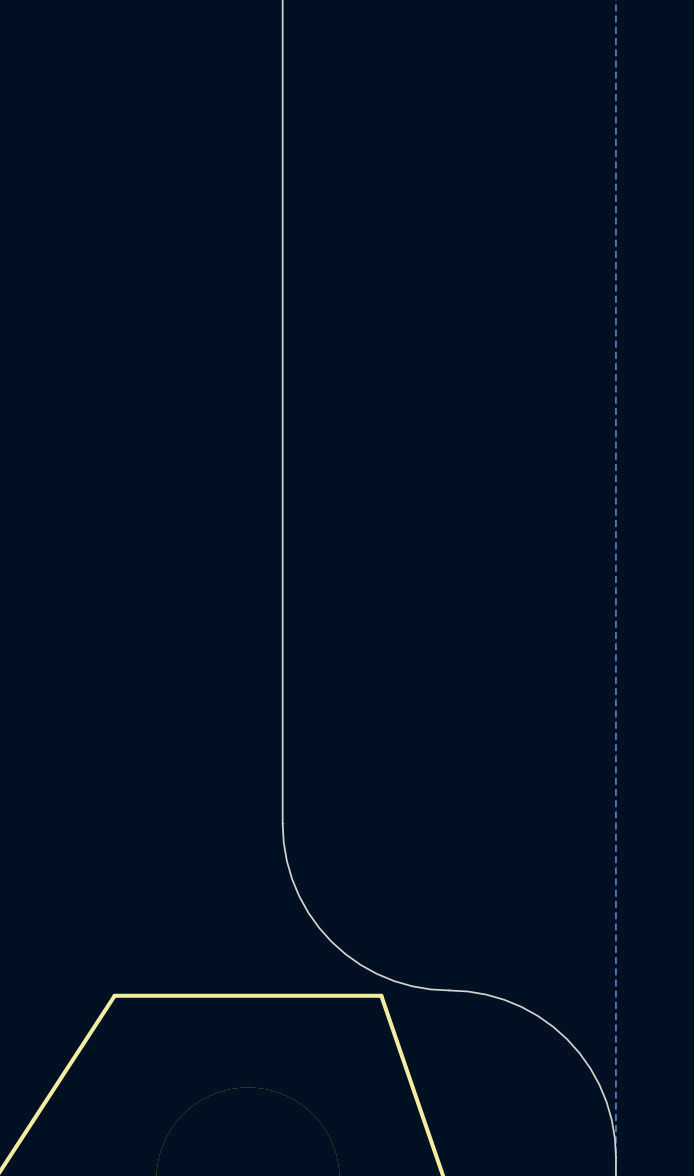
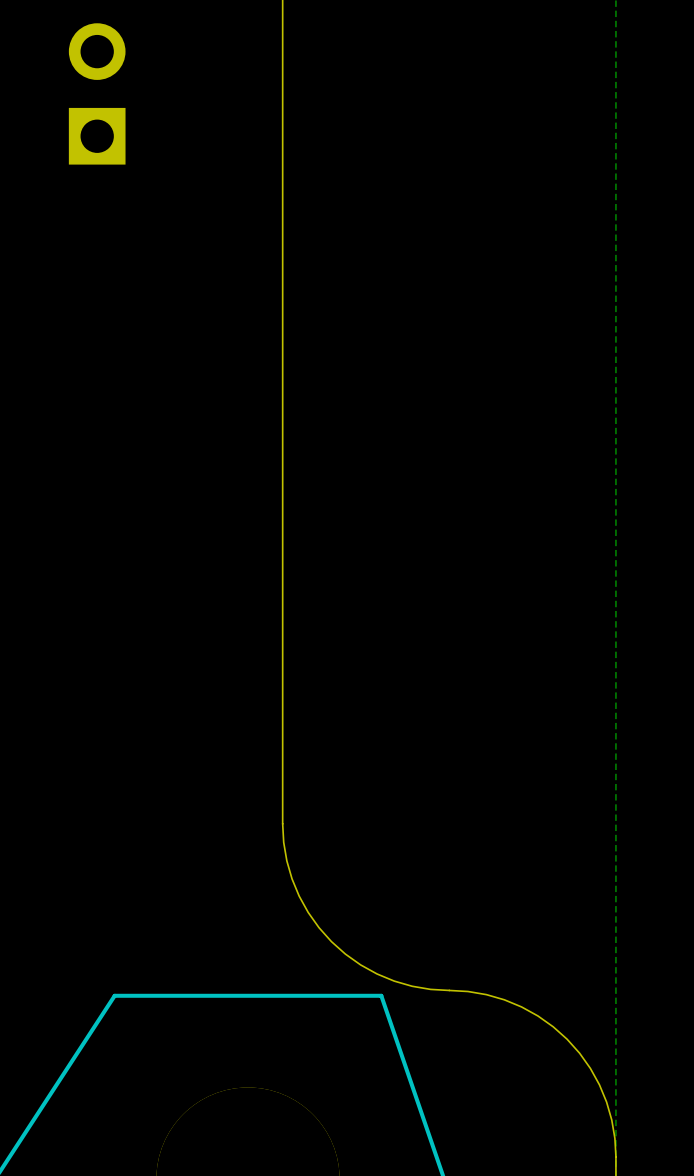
part: none -> (97, 93)

